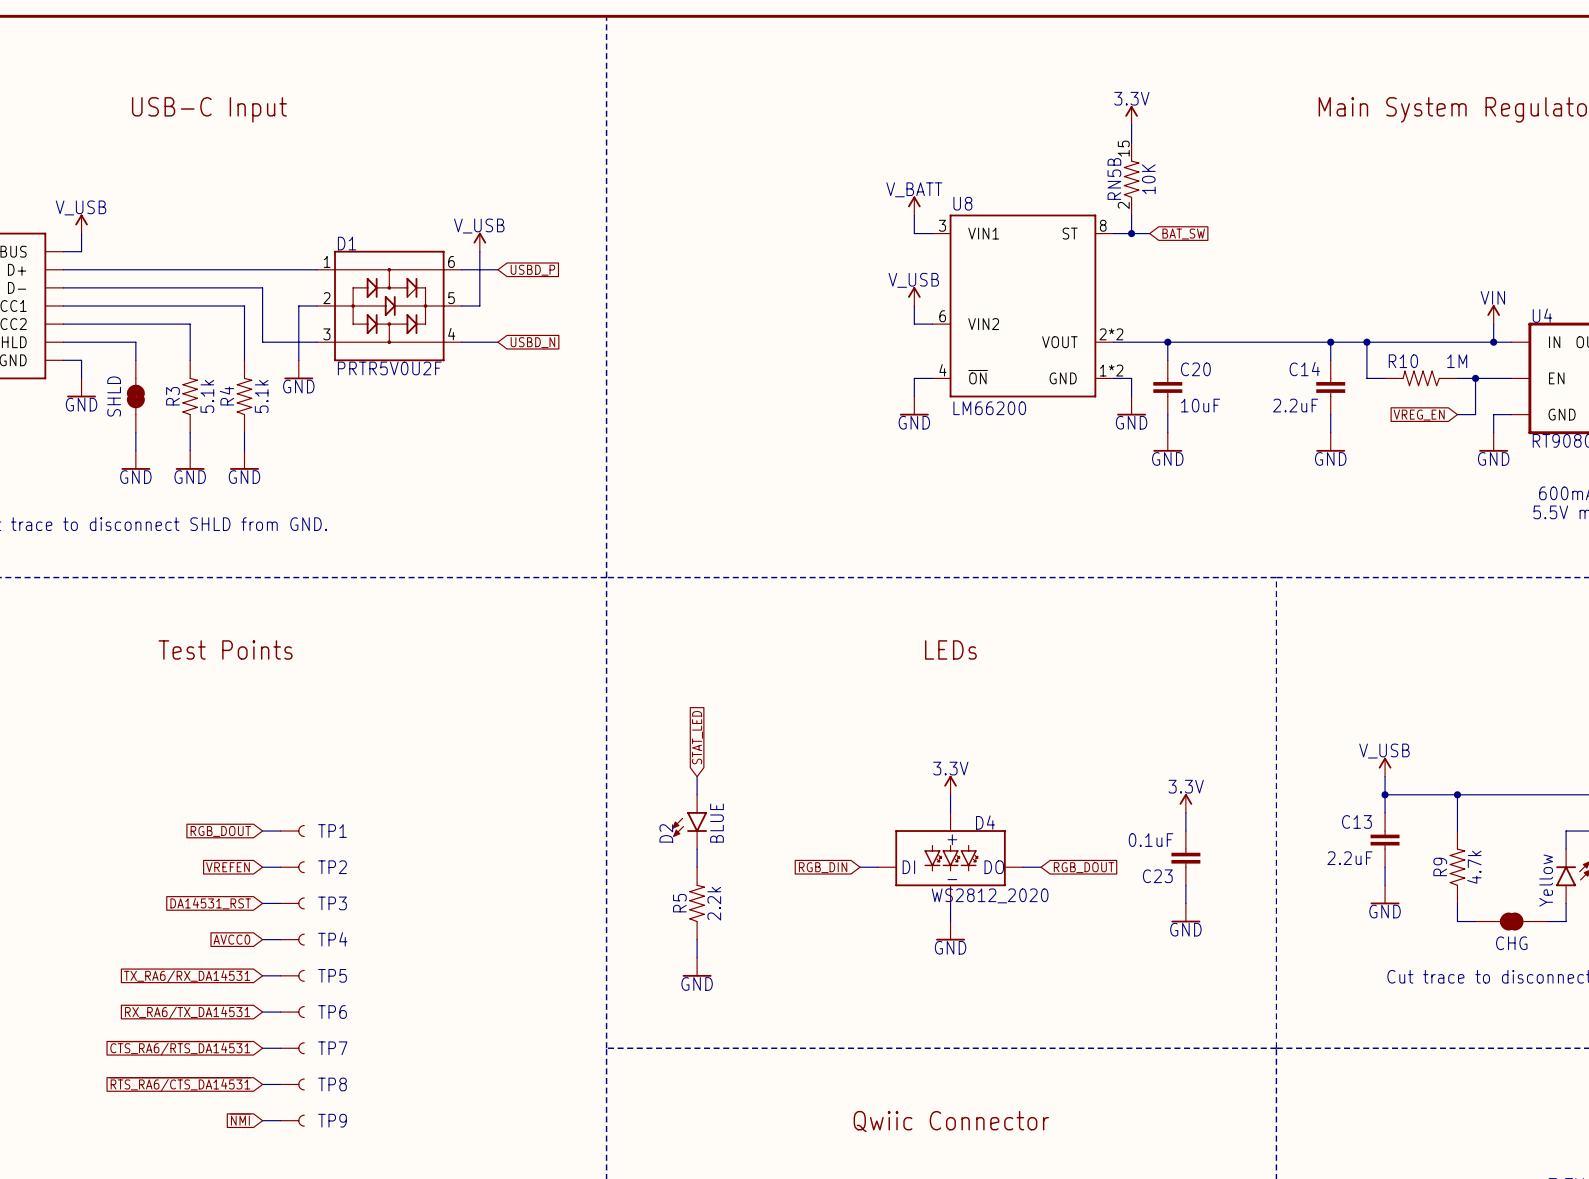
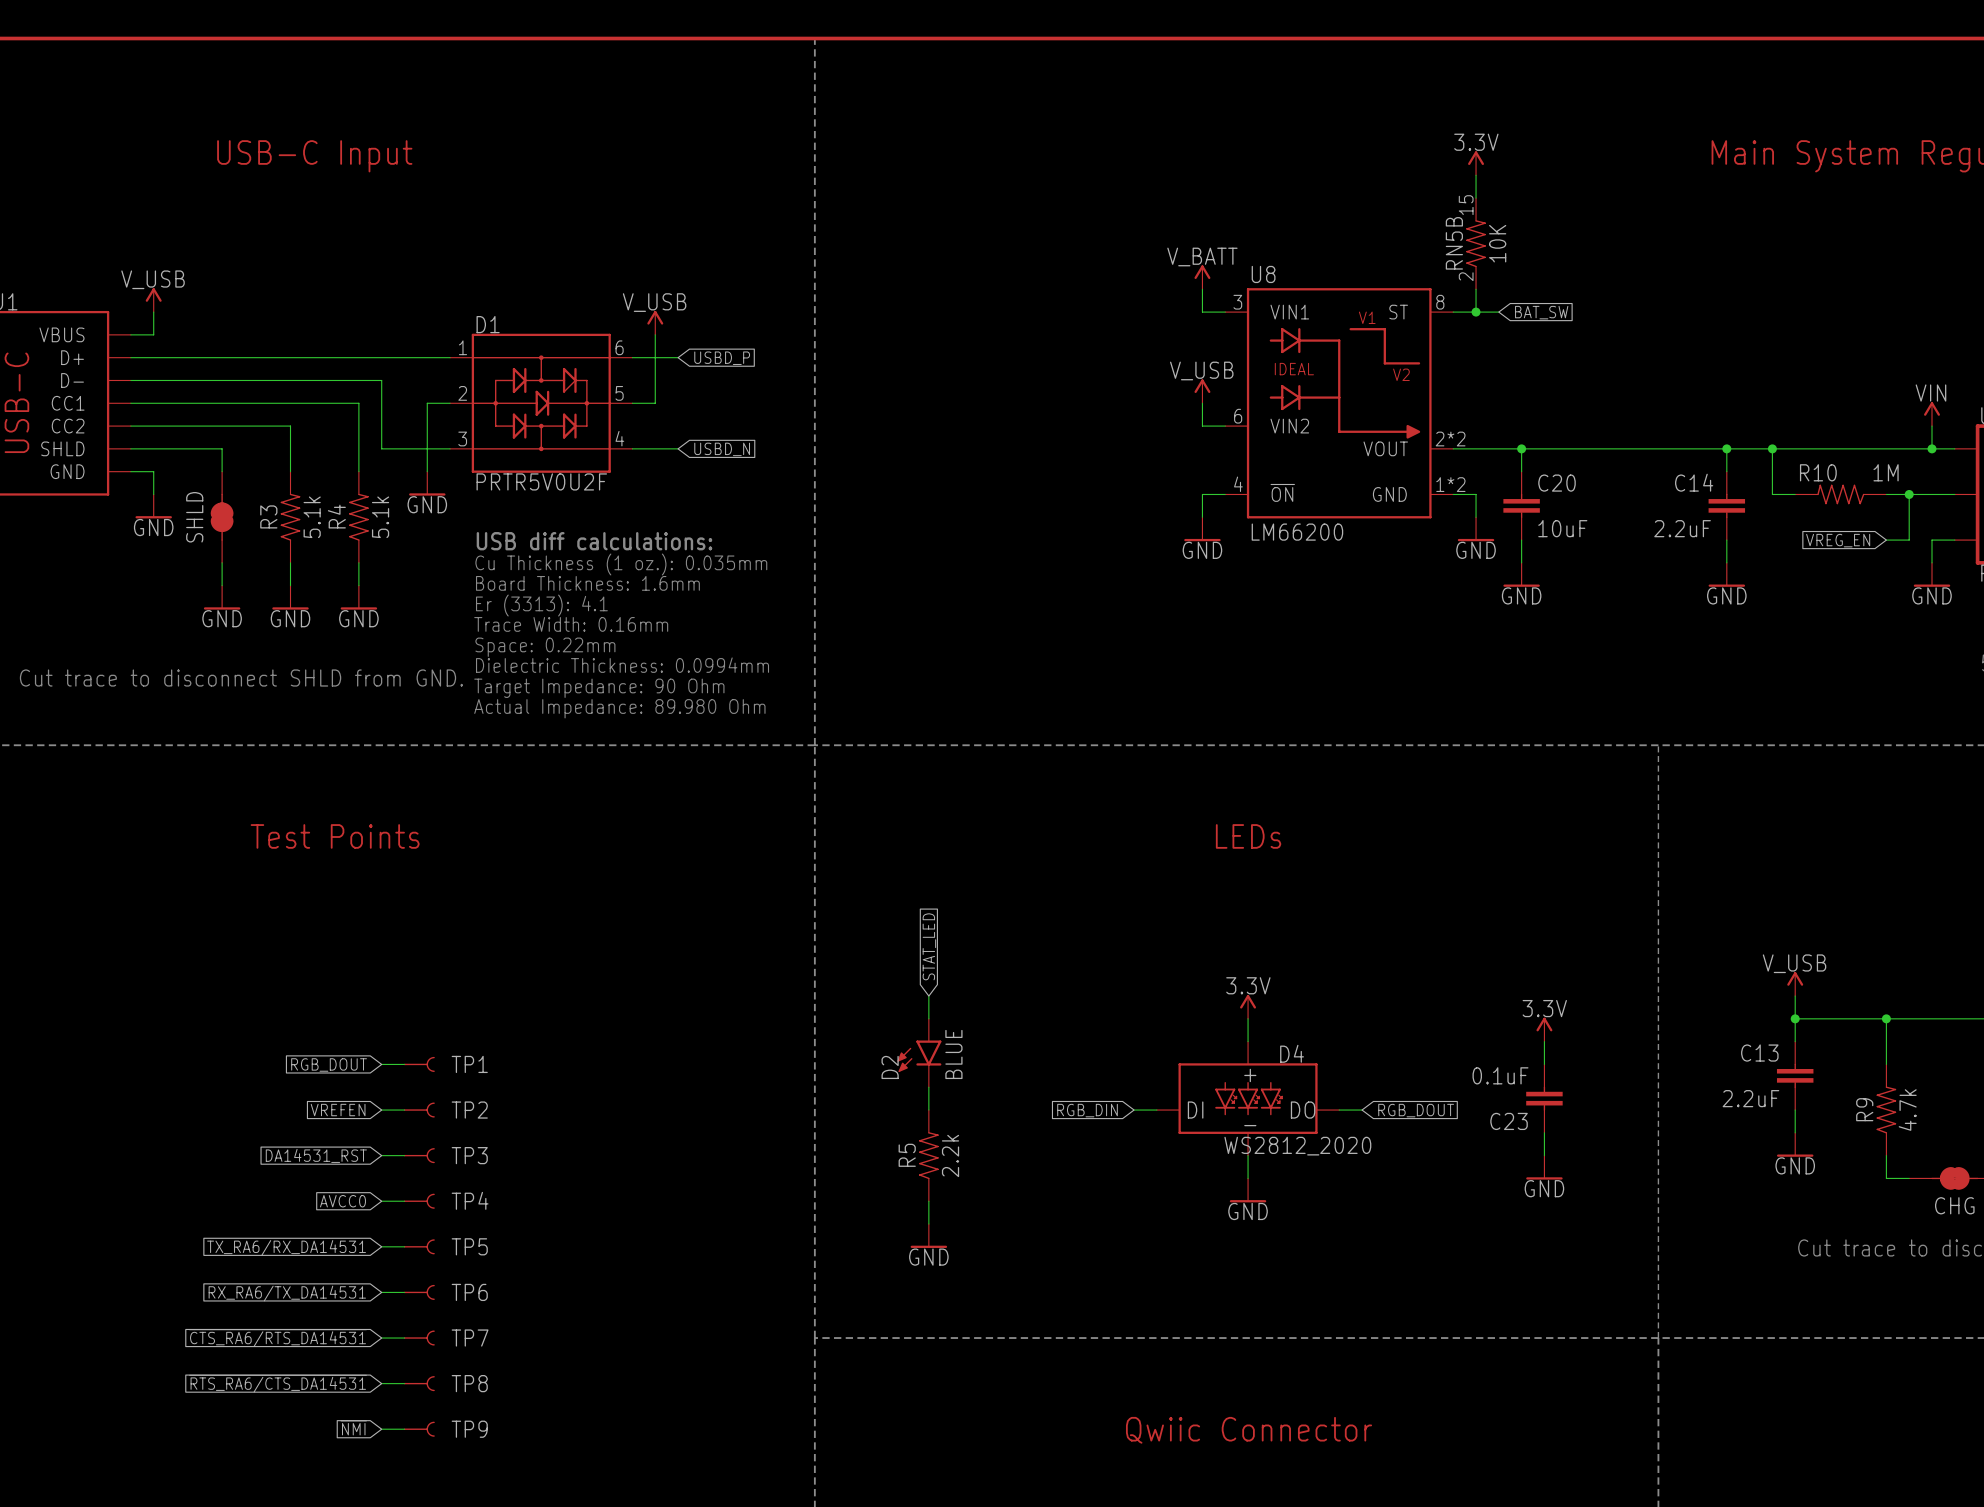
U8 symbol: [932, 214, 1114, 398] -> [1225, 288, 1454, 519]
text: none -> USB diff calculations: (594, 541)
text: none -> Cu Thickness (1 oz.): 0.035mm (621, 564)
text: none -> Board Thickness: 1.6mm (587, 583)
text: none -> Er (3313): 4.1 (541, 605)
text: none -> Trace Width: 0.16mm (571, 624)
text: none -> Space: 0.22mm (545, 647)
text: none -> Dielectric Thickness: 0.0994mm (622, 665)
text: none -> Target Impedance: 90 Ohm (599, 688)
text: none -> Actual Impedance: 89.980 Ohm (619, 708)

